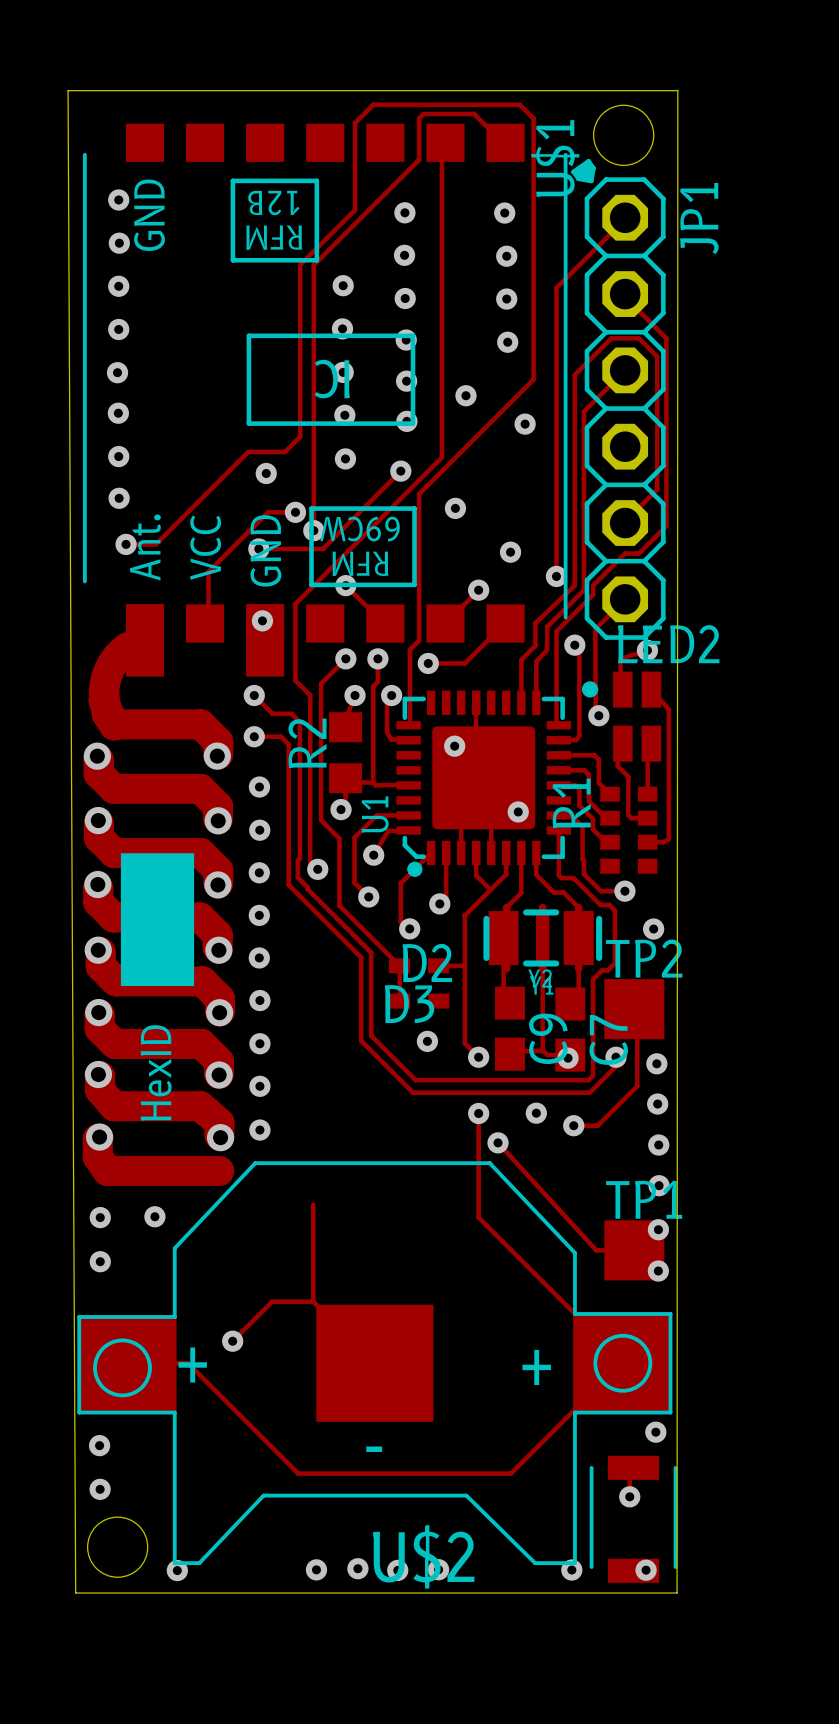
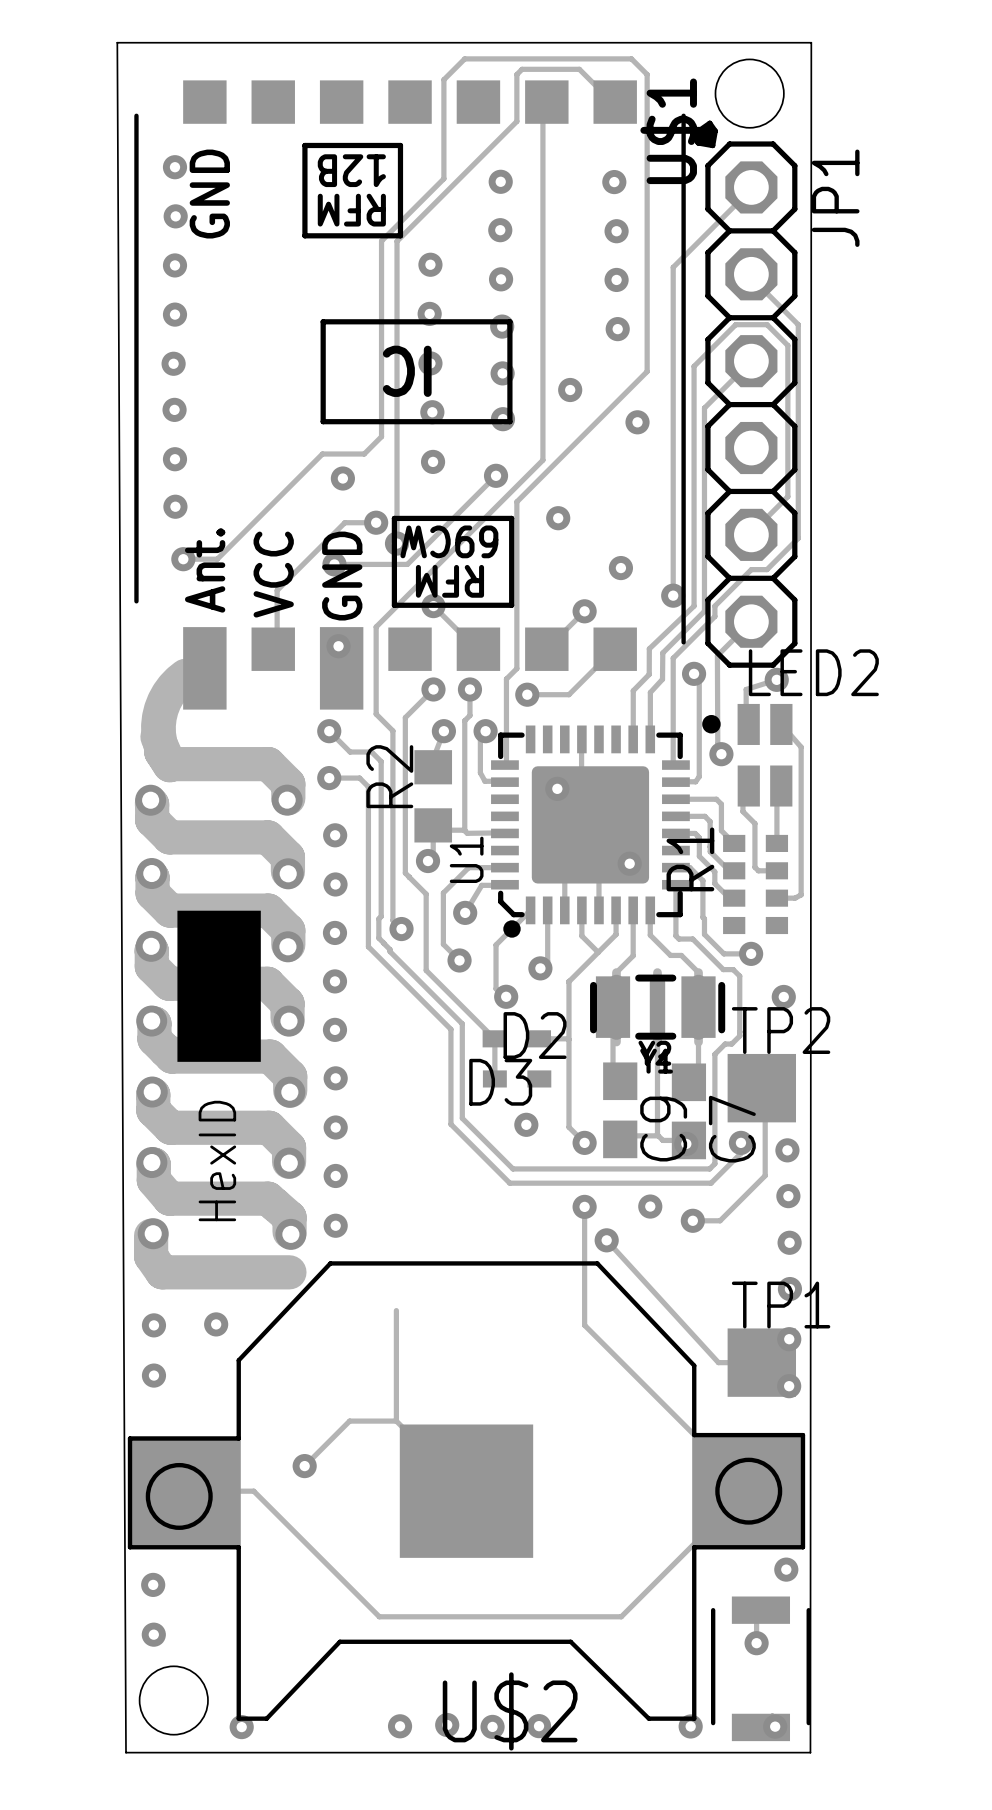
text: + (192, 1365) -> none
text: + (536, 1367) -> none
text: - (374, 1449) -> none

